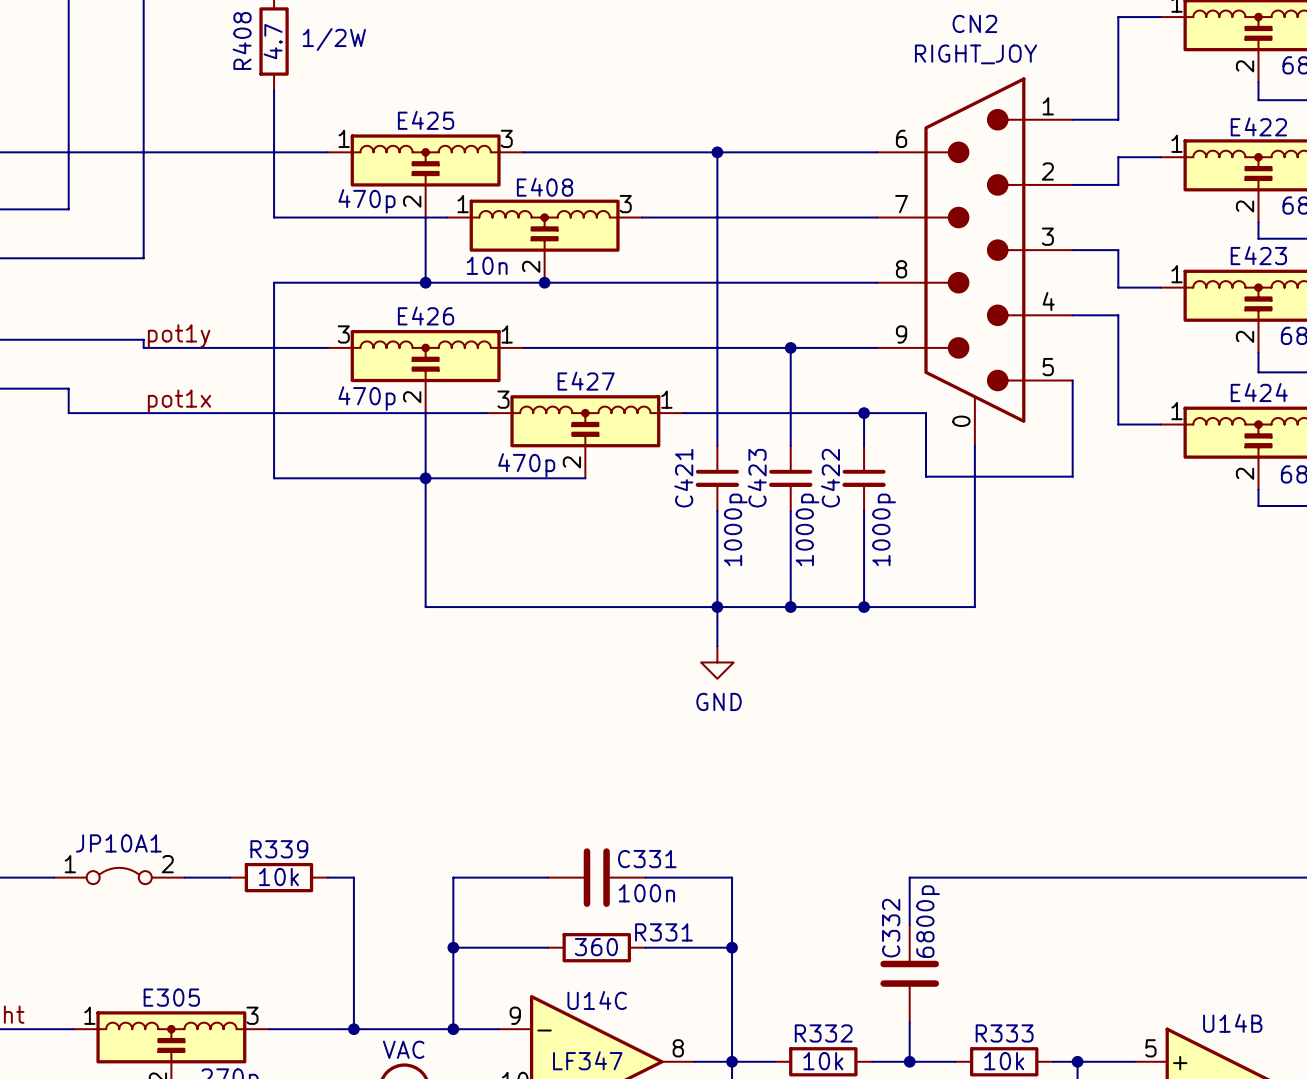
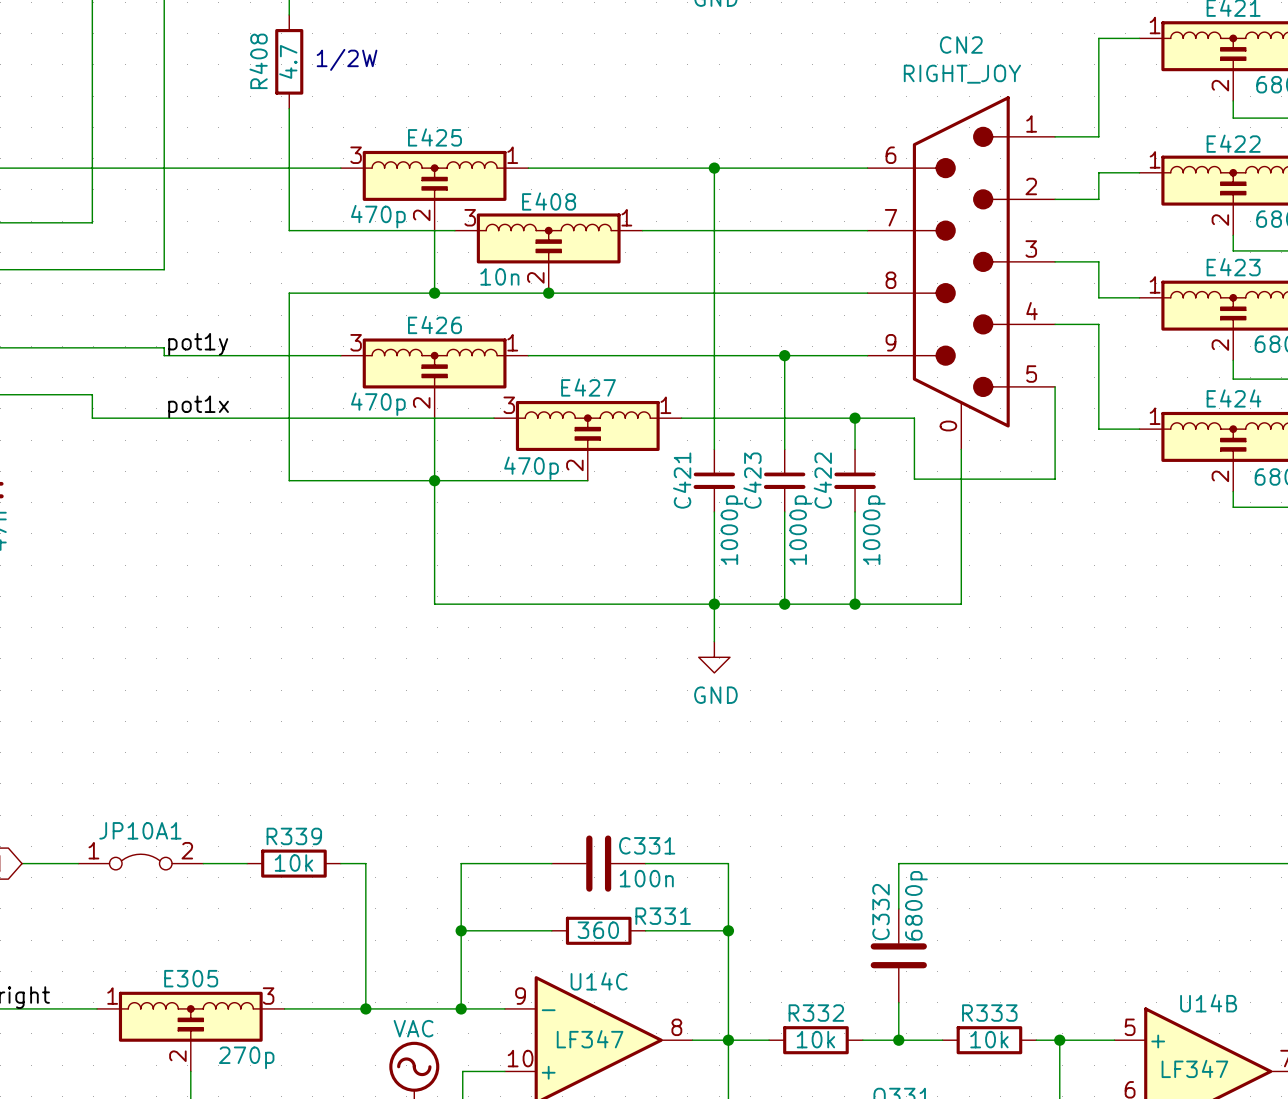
E425 flip: as is (425, 160) -> left-right (434, 175)
E408 flip: as is (544, 225) -> left-right (548, 238)

